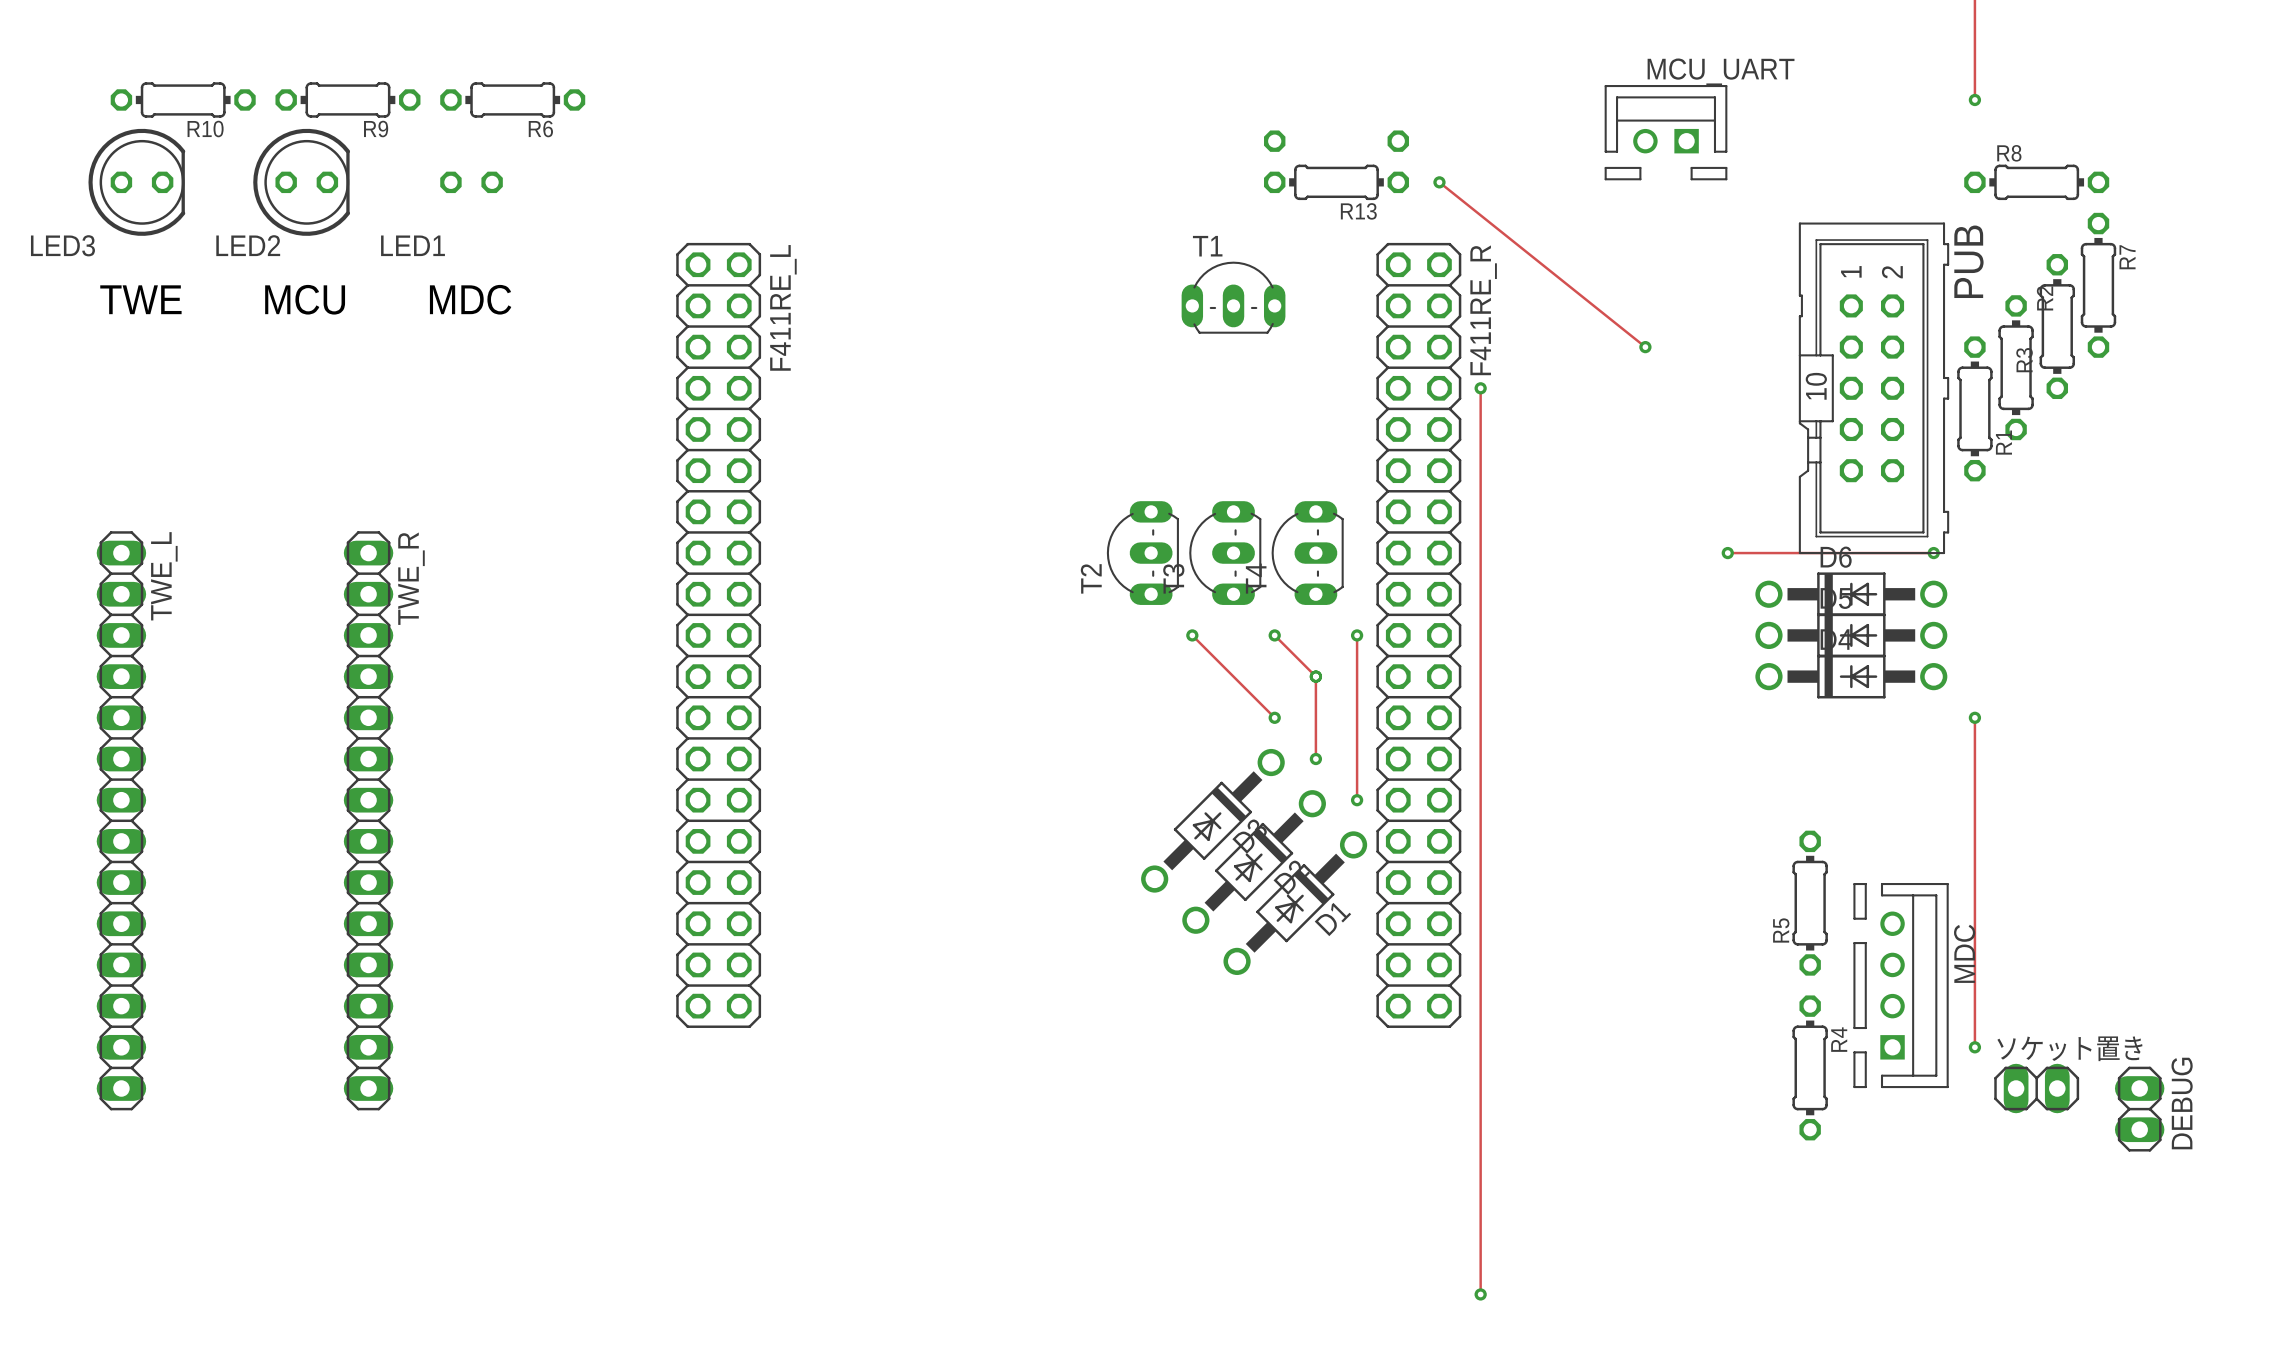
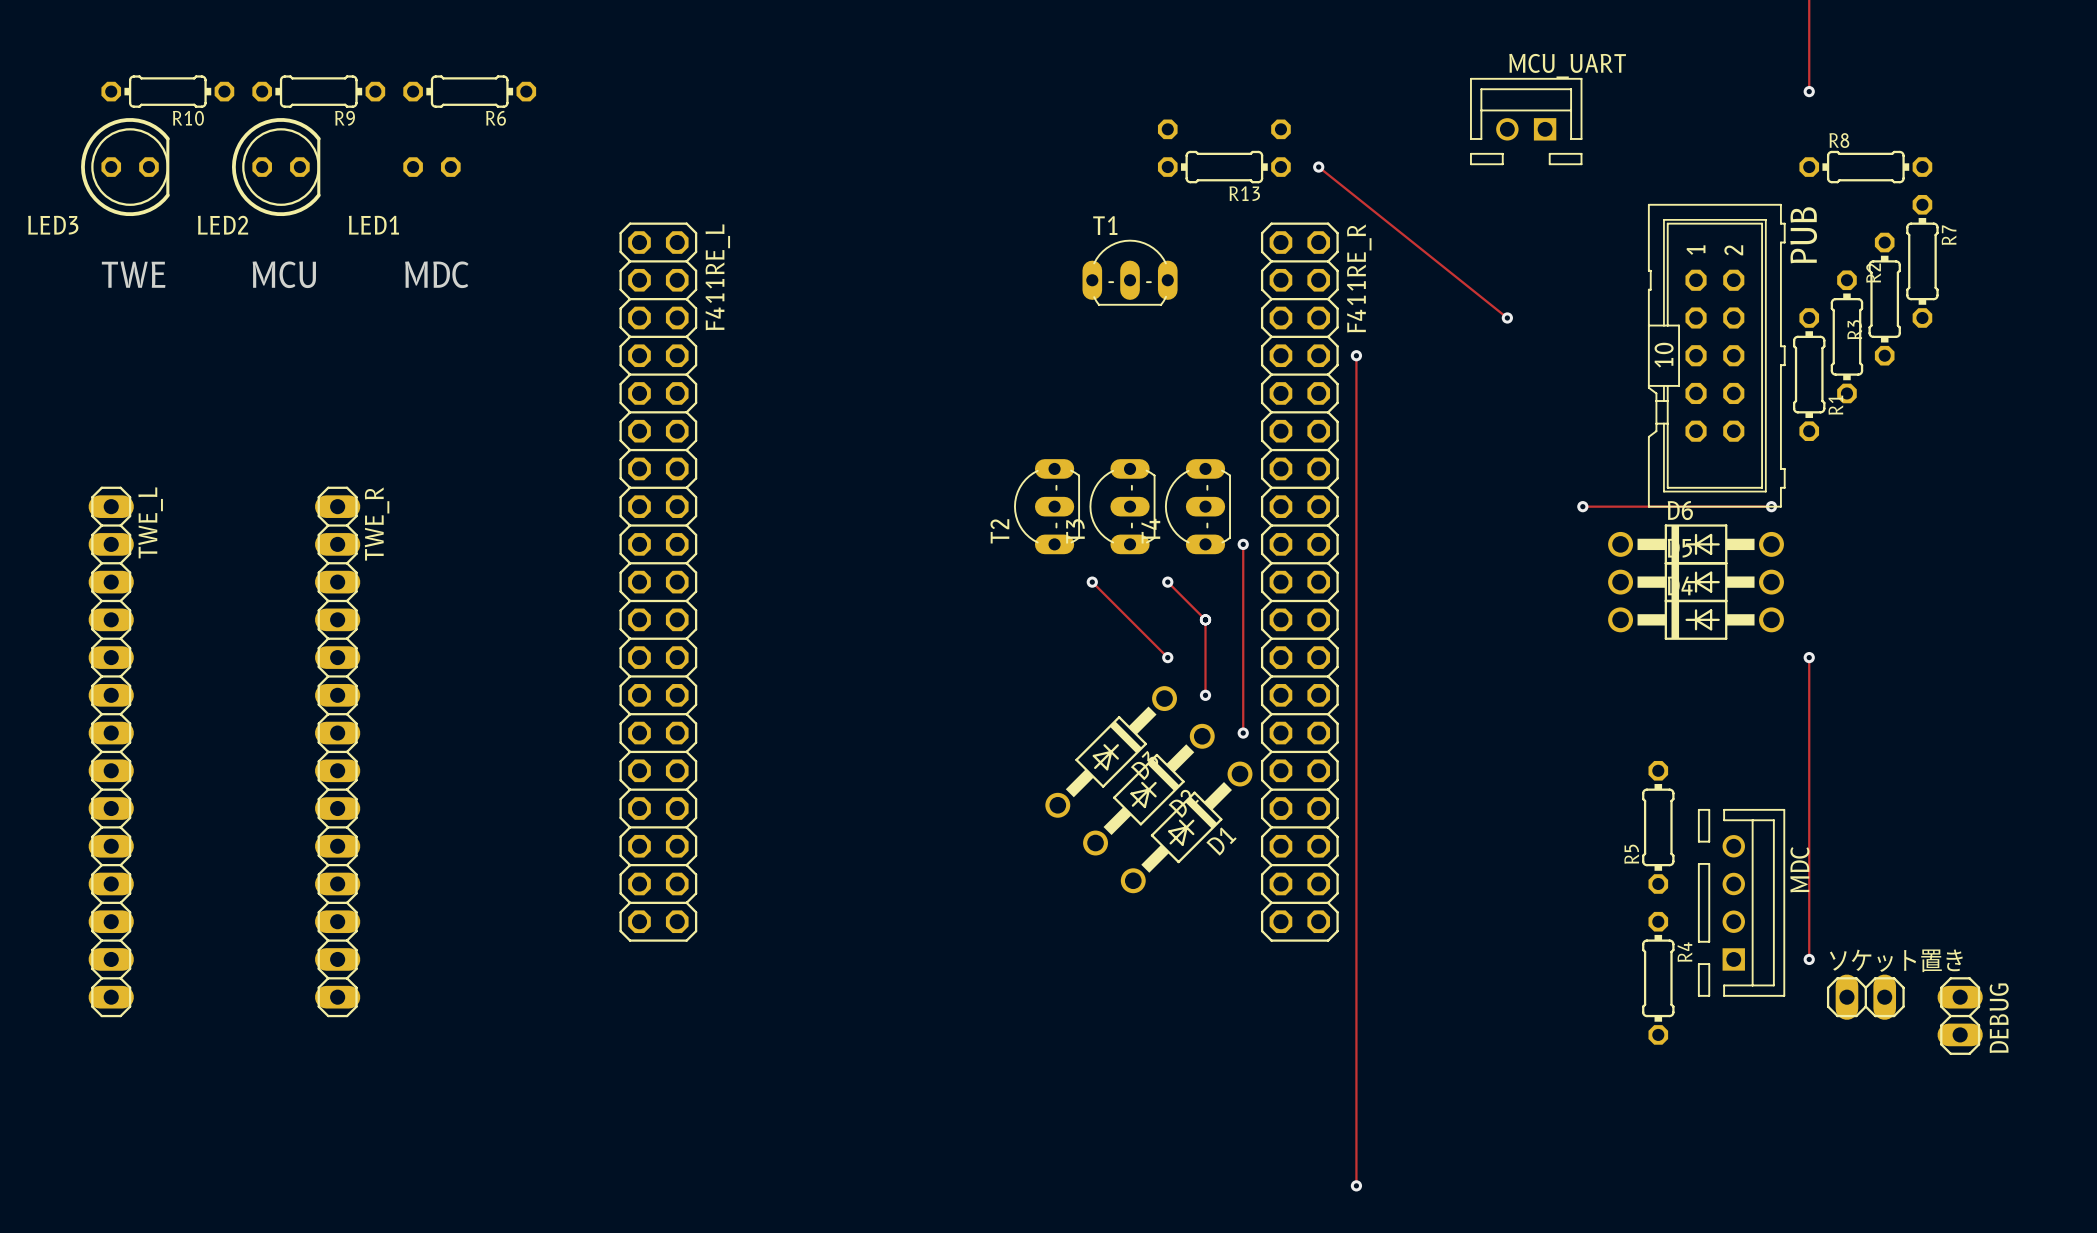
track: none -> (1243, 544) (1243, 582)
via position: (1357, 635) -> (1243, 544)

